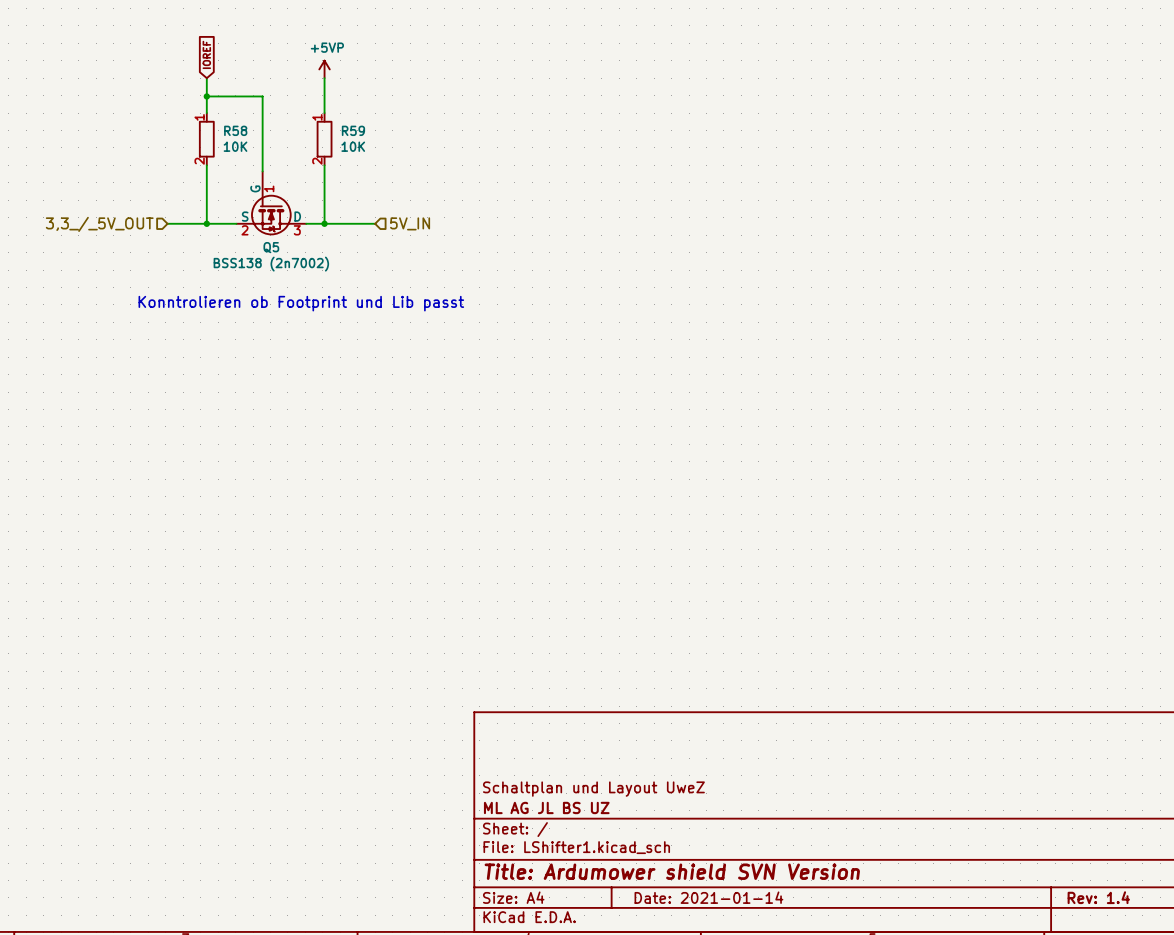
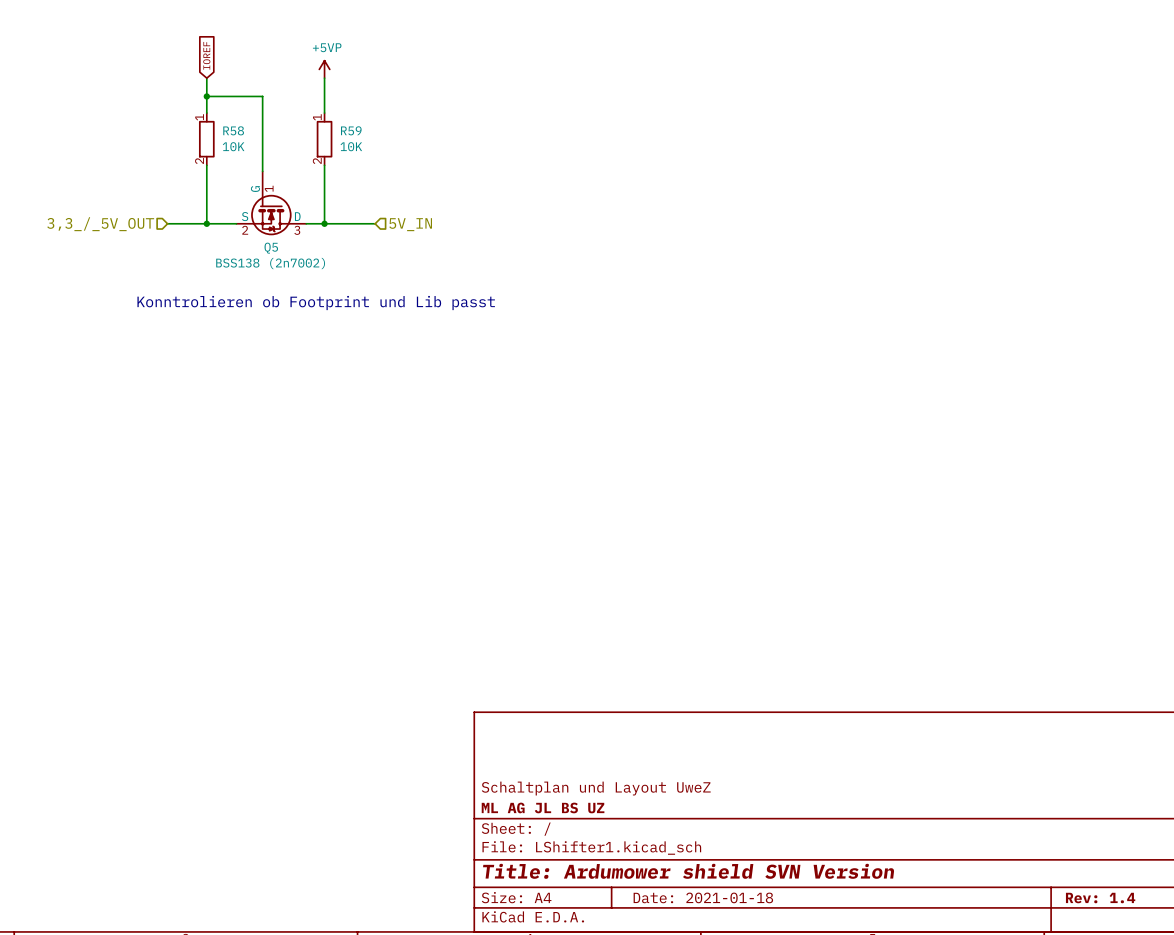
title block: Date: 2021-01-14 (708, 897) -> Date: 2021-01-18 (703, 897)

